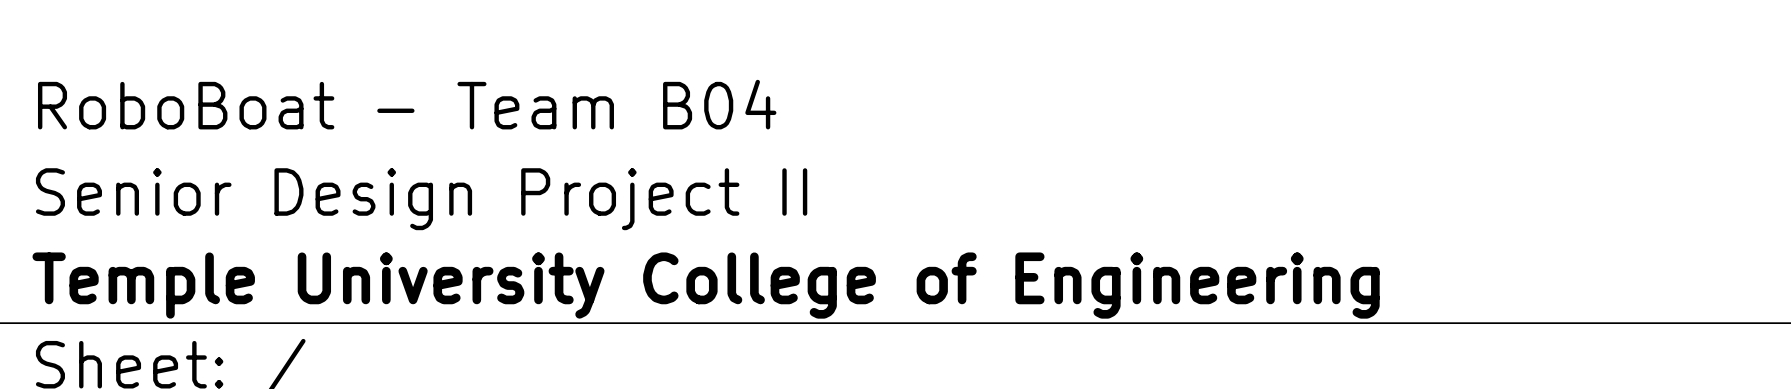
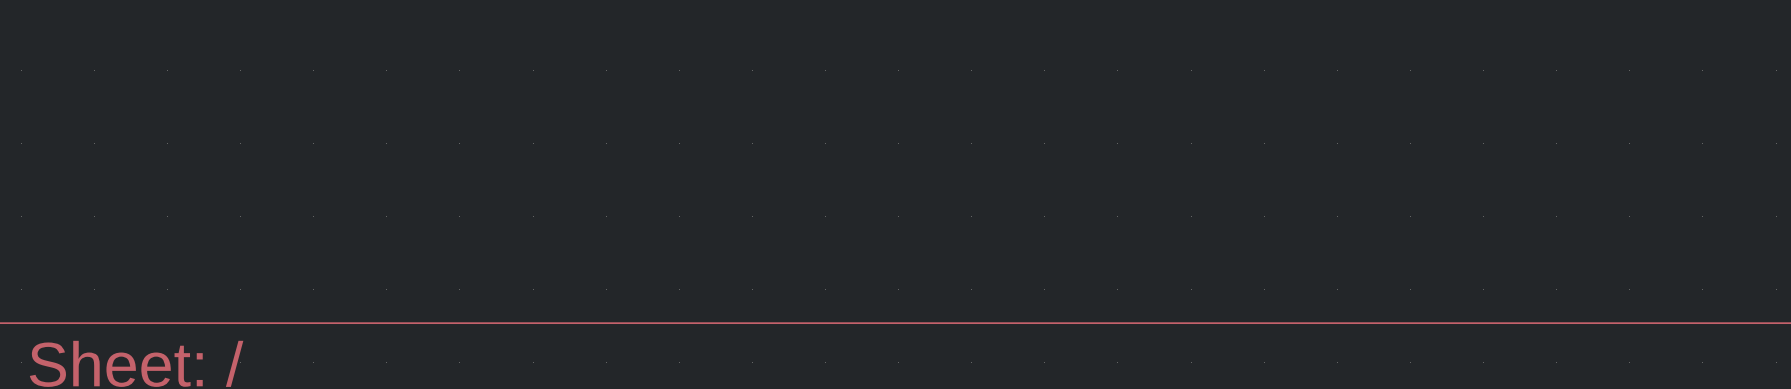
title block: RoboBoat - Team B04 (407, 104) -> none
title block: Senior Design Project II (421, 199) -> none
title block: Temple University College of Engineering (706, 285) -> none

